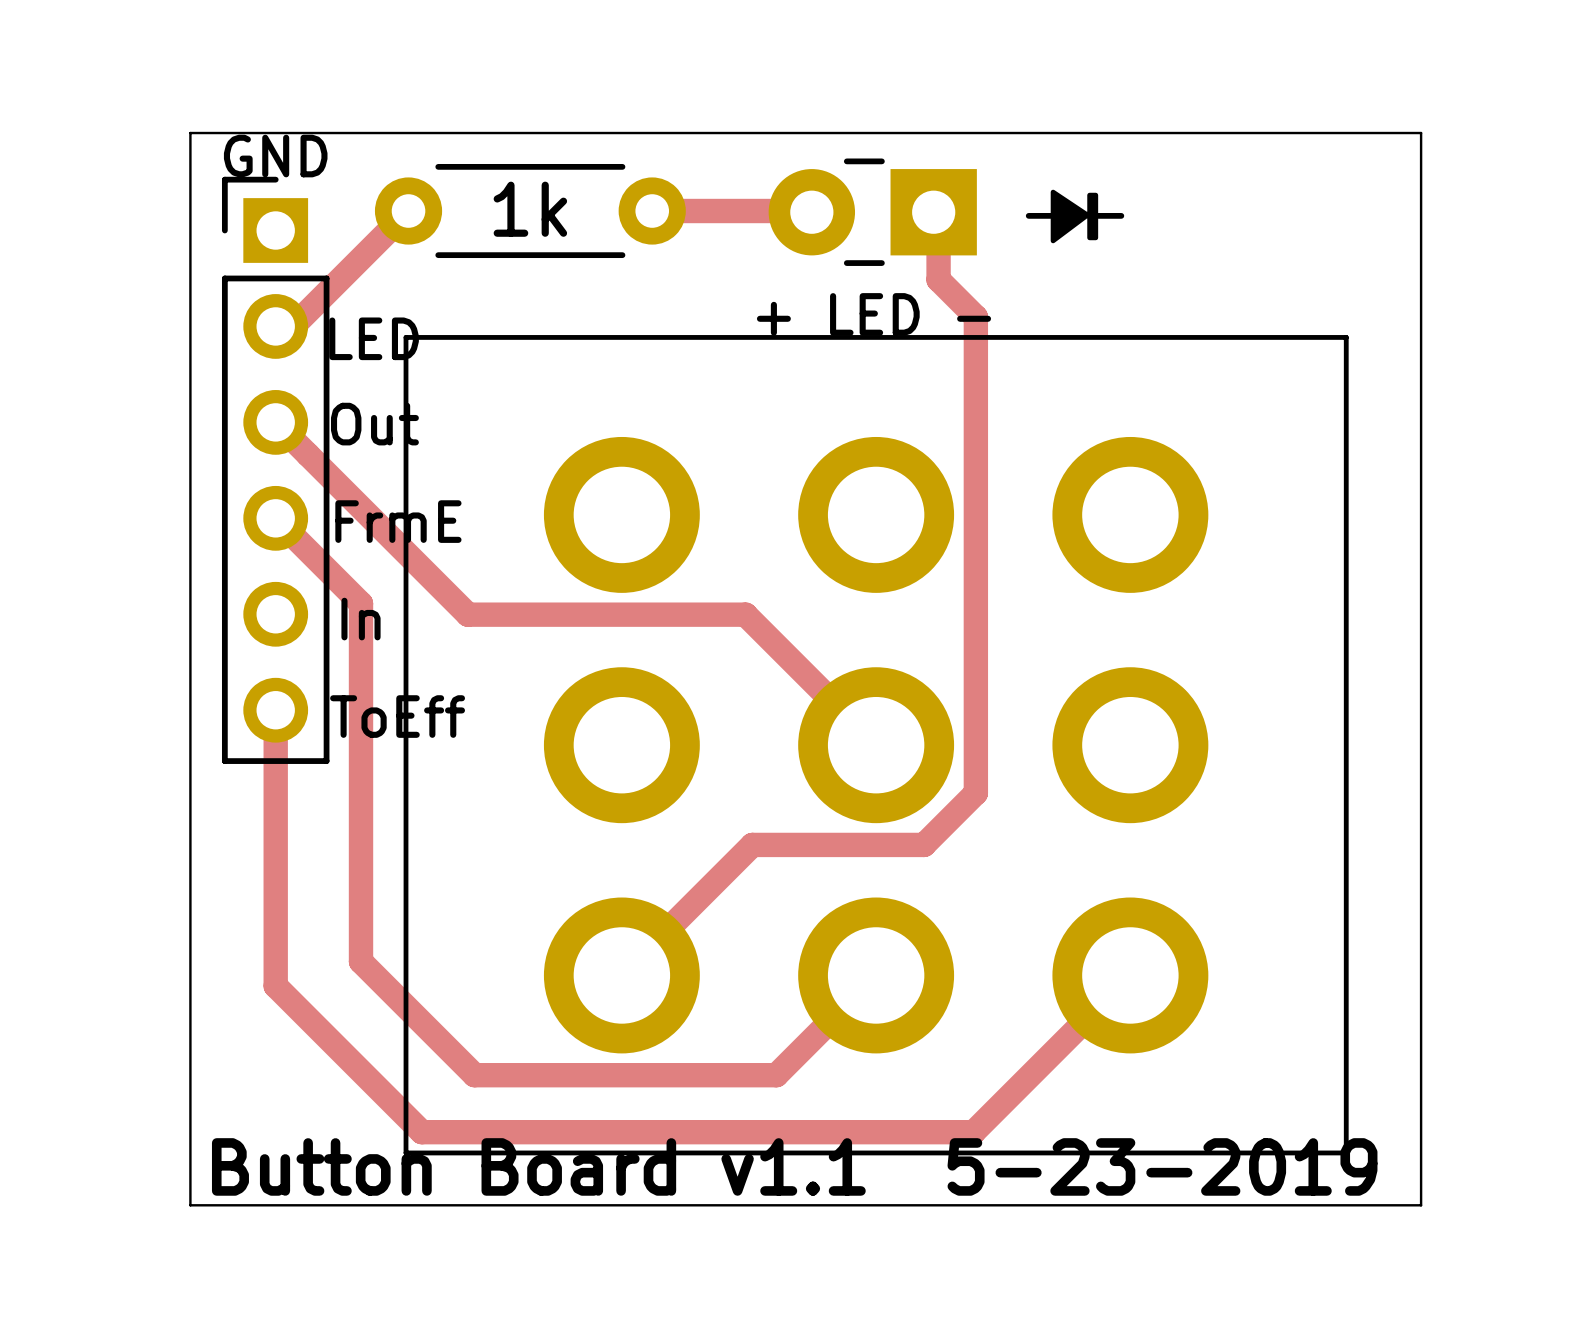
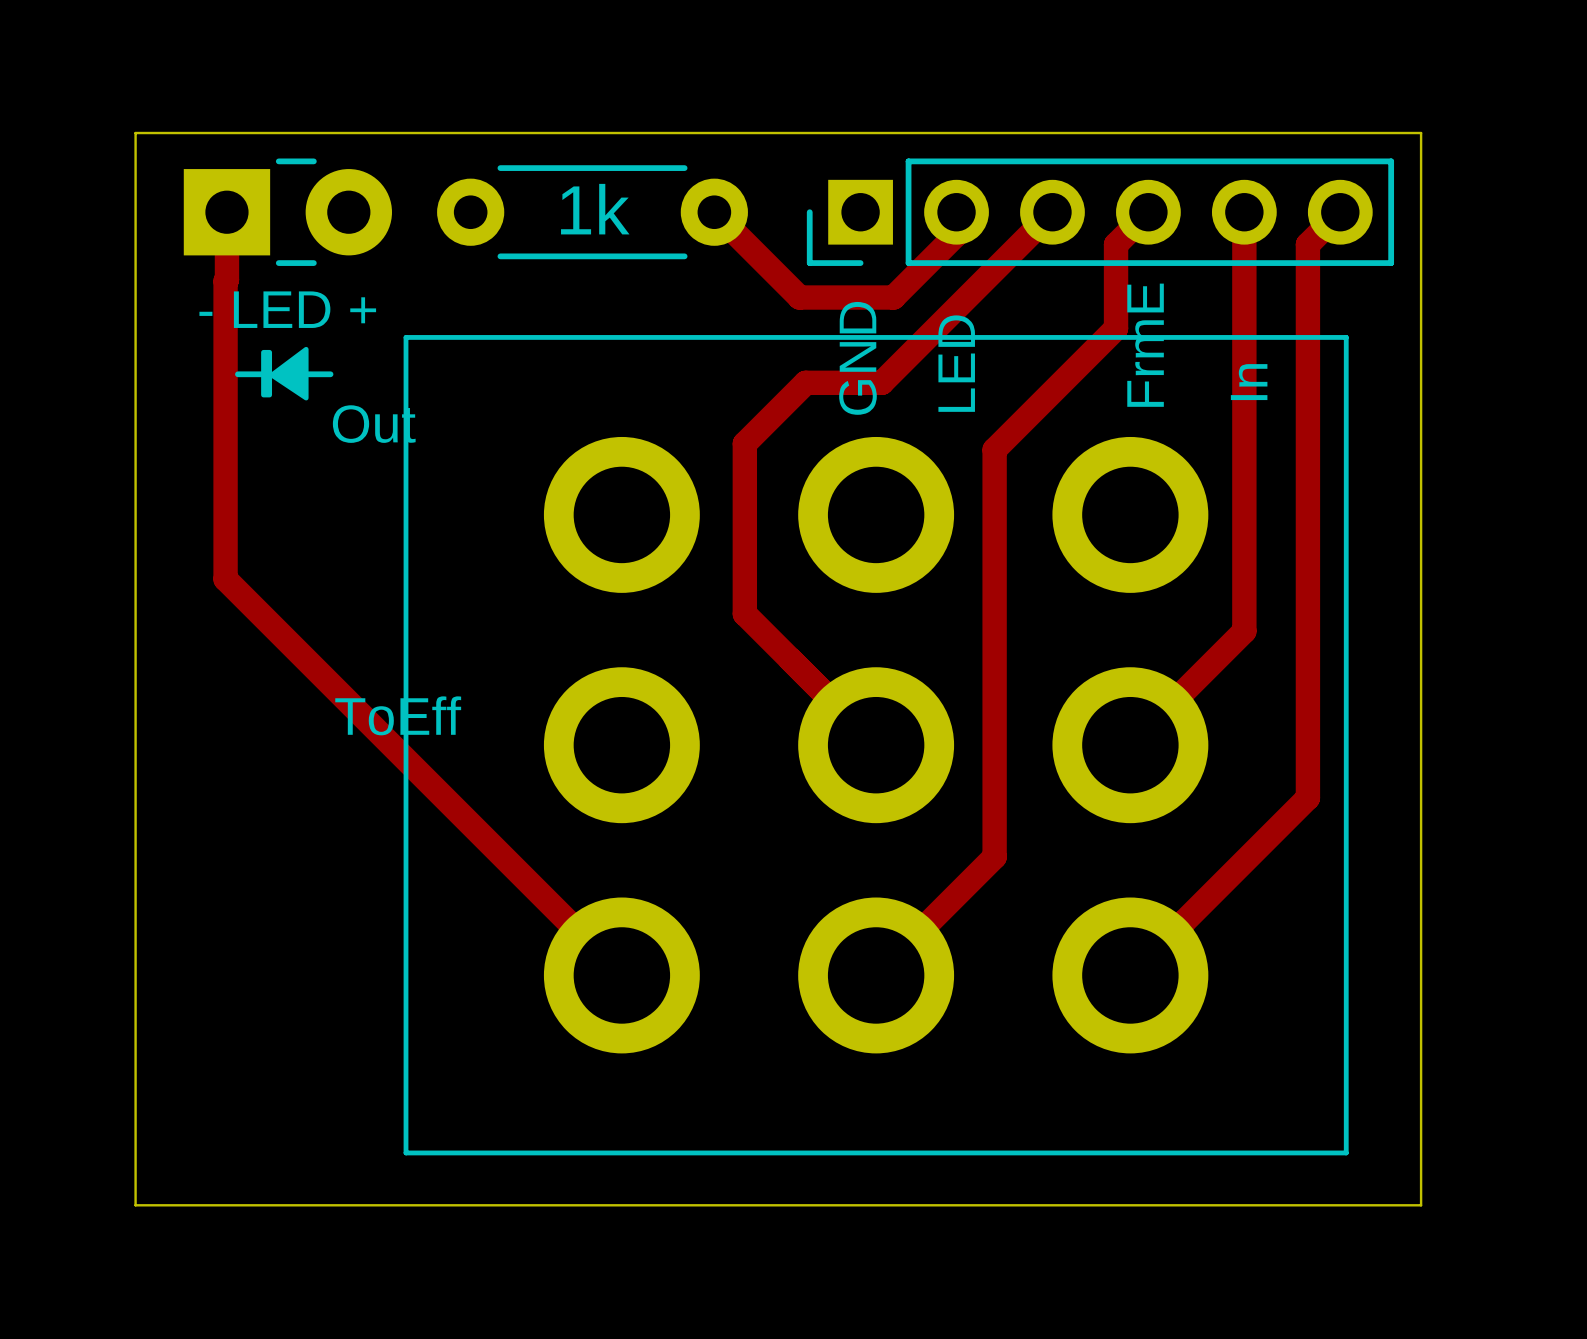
board edge: (190, 133) (190, 1205) -> (190, 133) (135, 133) (135, 1205) (190, 1205)
drawing: [1050, 189, 1099, 244] -> none
track: (408, 211) (293, 326) (275, 326) -> none
part position: (530, 211) -> (592, 212)
track: (652, 211) (816, 212) -> none
part: none -> - LED + (287, 212)
track: none -> (714, 212) (799, 297) (893, 297) (956, 234) (956, 212)
part: + LED - (872, 212) -> none
track: (933, 212) (938, 217) (938, 279) (975, 317) (975, 793) (924, 844) (752, 844) (621, 975) -> (226, 212) (225, 579) (621, 975)
part: none -> (1100, 212)
track: none -> (1244, 212) (1244, 631) (1176, 698)
line: (1028, 215) (1053, 215) -> (237, 374) (262, 374)
line: (1096, 215) (1121, 215) -> (306, 374) (330, 374)
text rotation: 0° (374, 338) -> 90° counterclockwise (956, 363)
text position: LED (374, 338) -> LED (956, 363)
drawing: none -> [261, 346, 309, 401]
track: (275, 422) (467, 614) (745, 614) -> (1052, 212) (881, 382) (805, 382) (744, 443) (745, 614)
part: (275, 470) -> none
track: (275, 518) (361, 603) (361, 961) (474, 1075) (776, 1075) (876, 975) -> (1148, 212) (1116, 244) (1116, 328) (994, 449) (994, 856) (876, 975)
text rotation: 0° (398, 521) -> 90° counterclockwise (1145, 345)
text position: FrmE (398, 521) -> FrmE (1145, 345)
text rotation: 0° (361, 619) -> 90° counterclockwise (1249, 382)
text position: In (361, 619) -> In (1249, 382)
track: (275, 710) (275, 985) (421, 1132) (973, 1132) (1130, 975) -> (1340, 212) (1307, 244) (1307, 797) (1130, 975)
text: Button Board v1.1 5-23-2019 (794, 1166) -> none

